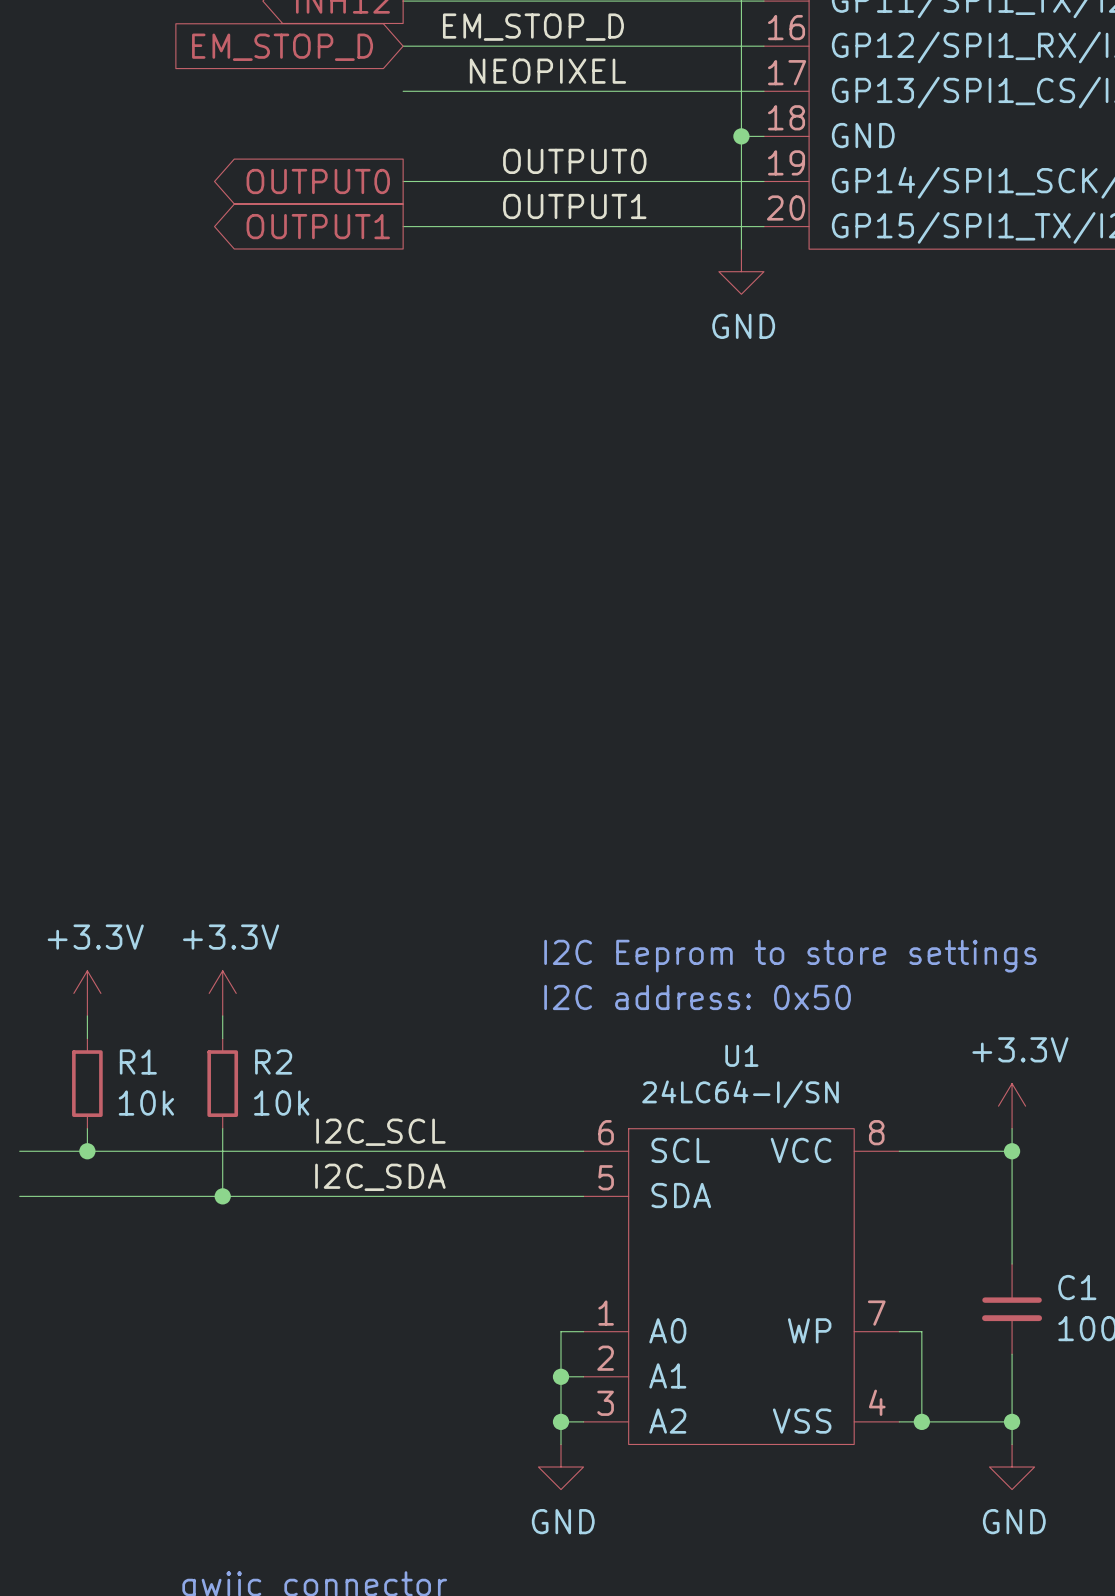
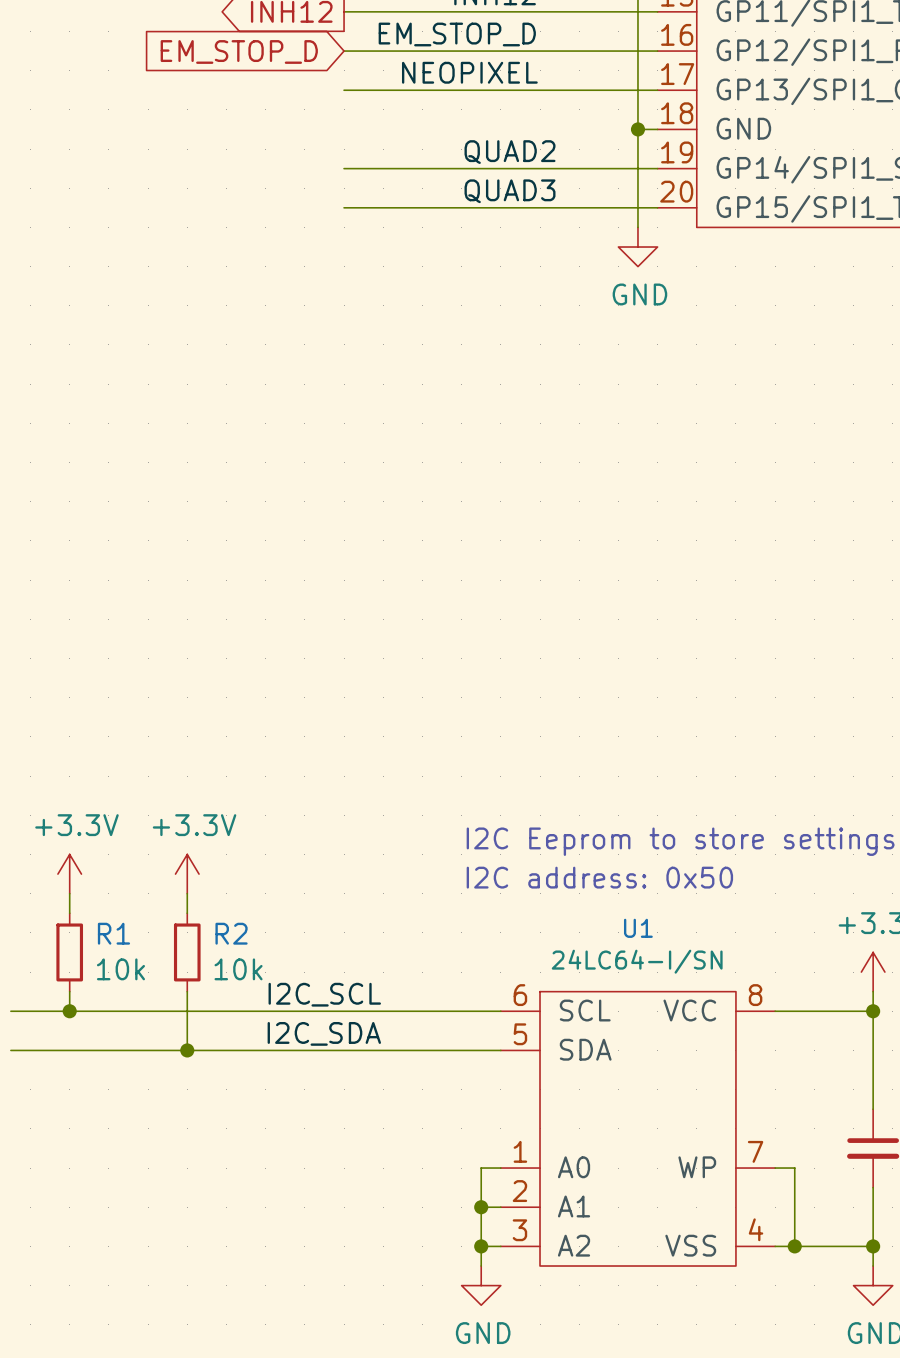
label: OUTPUT0 (574, 161) -> QUAD2 (509, 152)
global label: OUTPUT0 (318, 181) -> none
label: OUTPUT1 (574, 206) -> QUAD3 (509, 191)
global label: OUTPUT1 (318, 226) -> none

